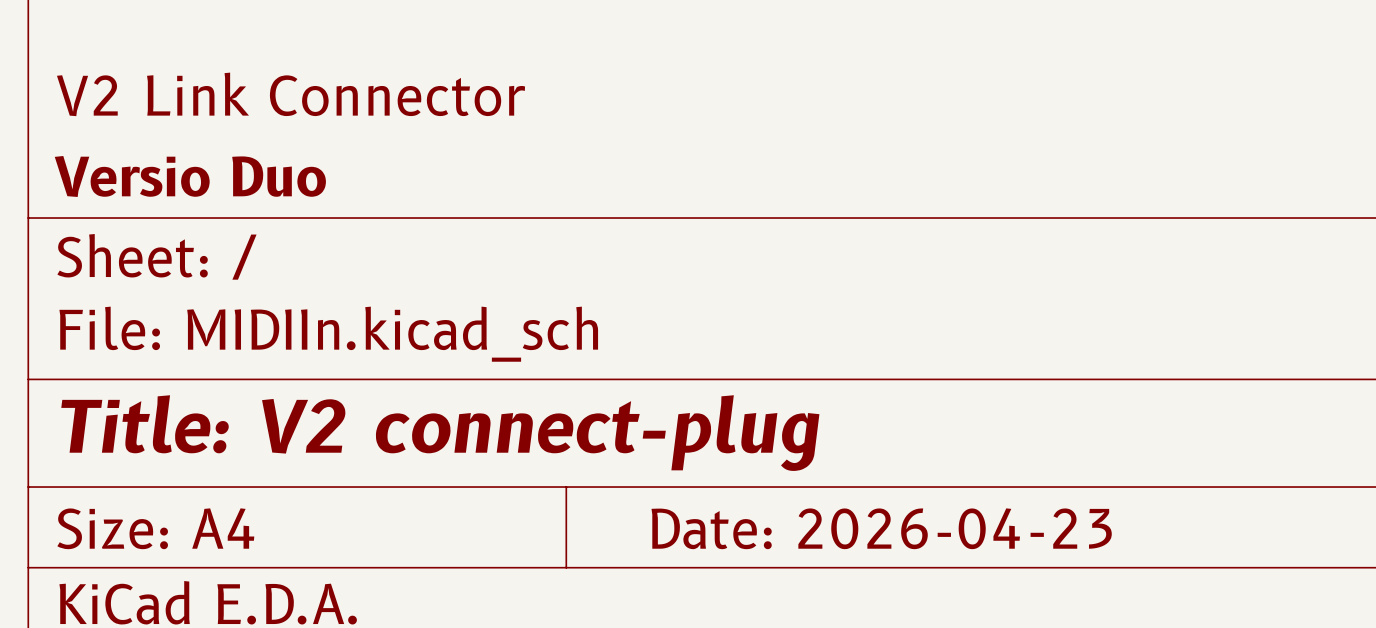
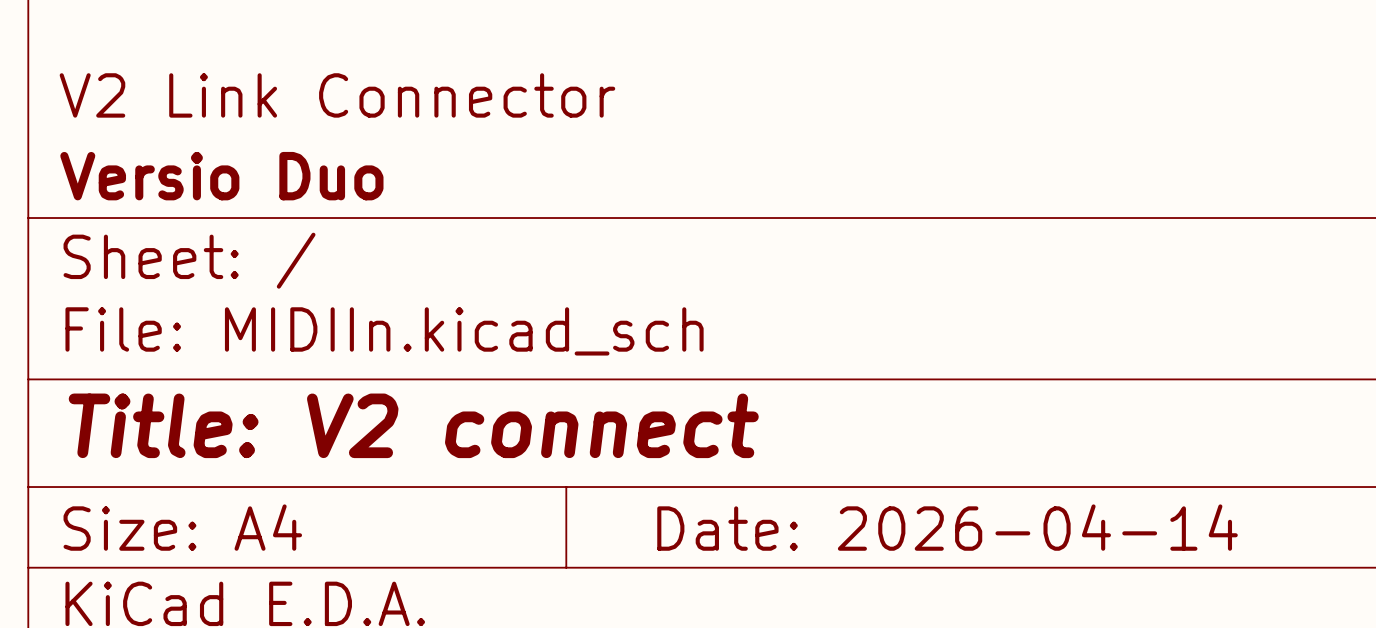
title block: Title: V2 connect-plug (440, 433) -> Title: V2 connect (413, 425)
title block: Date: 2026-04-23 (881, 528) -> Date: 2026-04-14 (947, 527)

